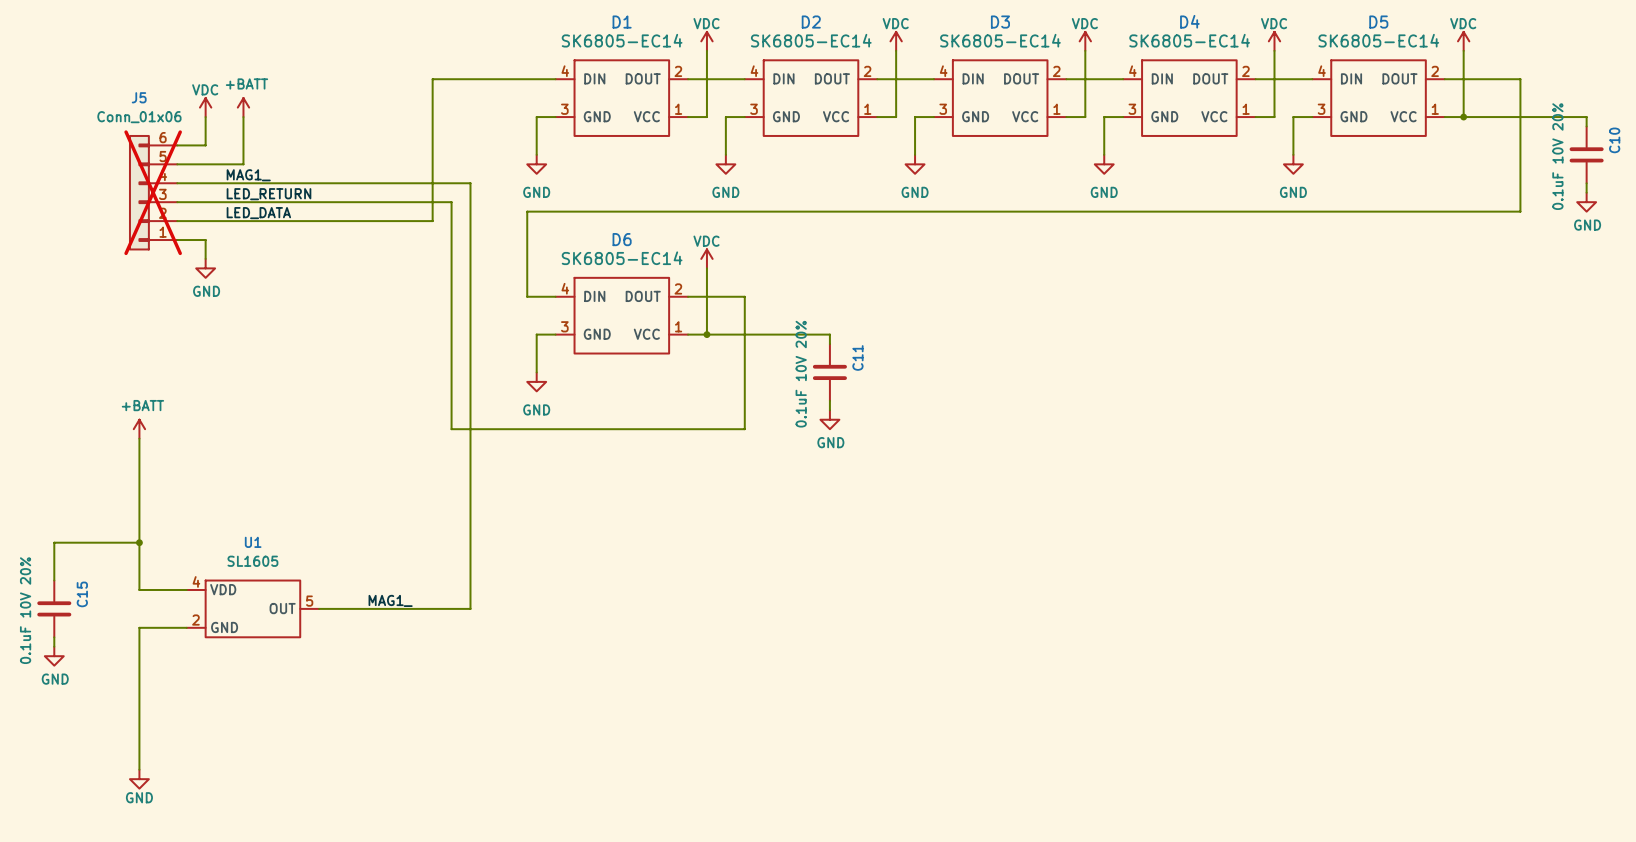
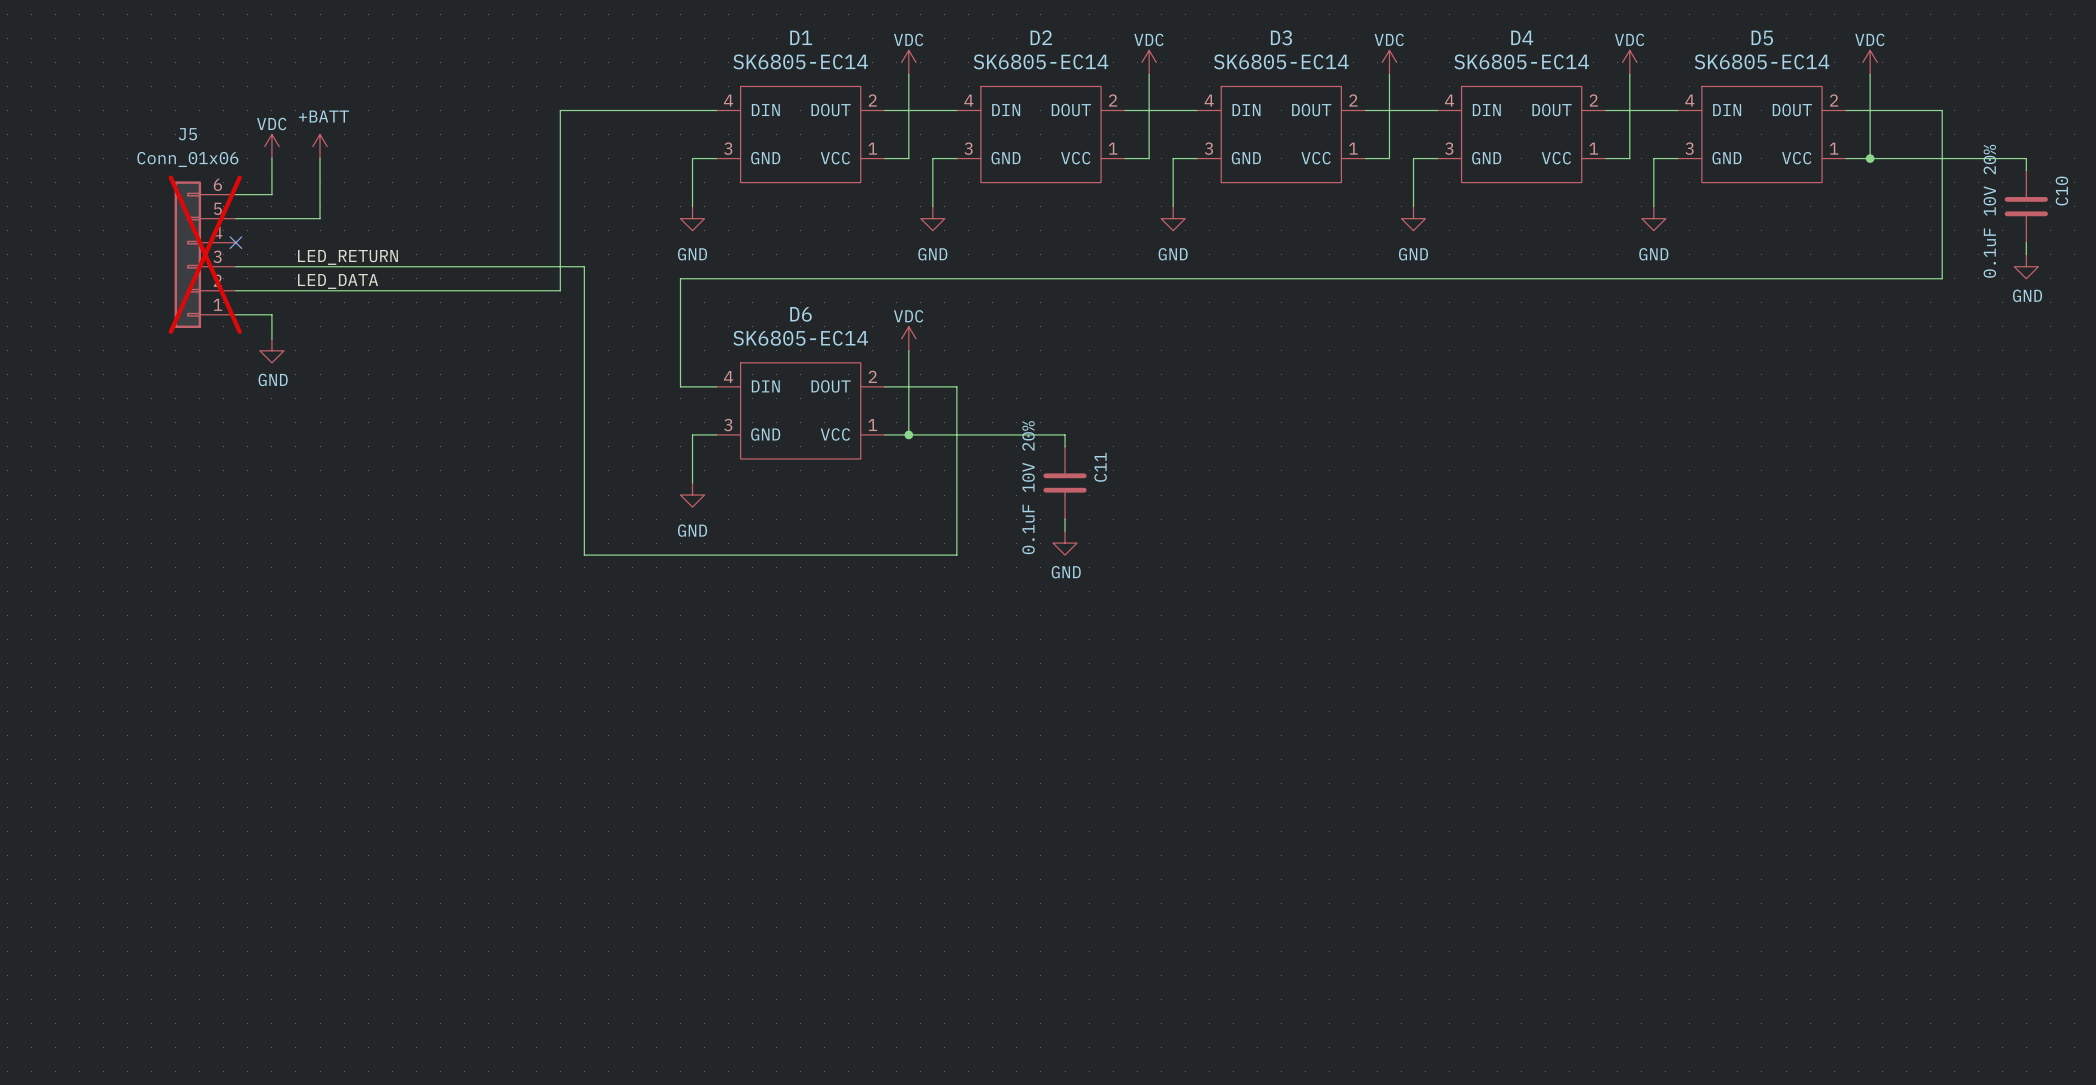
label: MAG1_ (248, 175) -> none
wire: (177, 183) (470, 183) (470, 608) (319, 608) -> none
no-connect mark: none -> (235, 242)
power symbol: +BATT (139, 429) -> none
wire: (139, 438) (139, 589) (186, 589) -> none
wire: (139, 542) (54, 542) (54, 580) -> none
junction: (139, 542) -> none
label: MAG1_ (390, 600) -> none
C15: 0.1uF 10V 20% (54, 608) -> none
U1: SL1605 (252, 608) -> none
wire: (186, 627) (139, 627) (139, 769) -> none
wire: (54, 637) (54, 646) -> none
power symbol: GND (54, 656) -> none
power symbol: GND (139, 779) -> none

